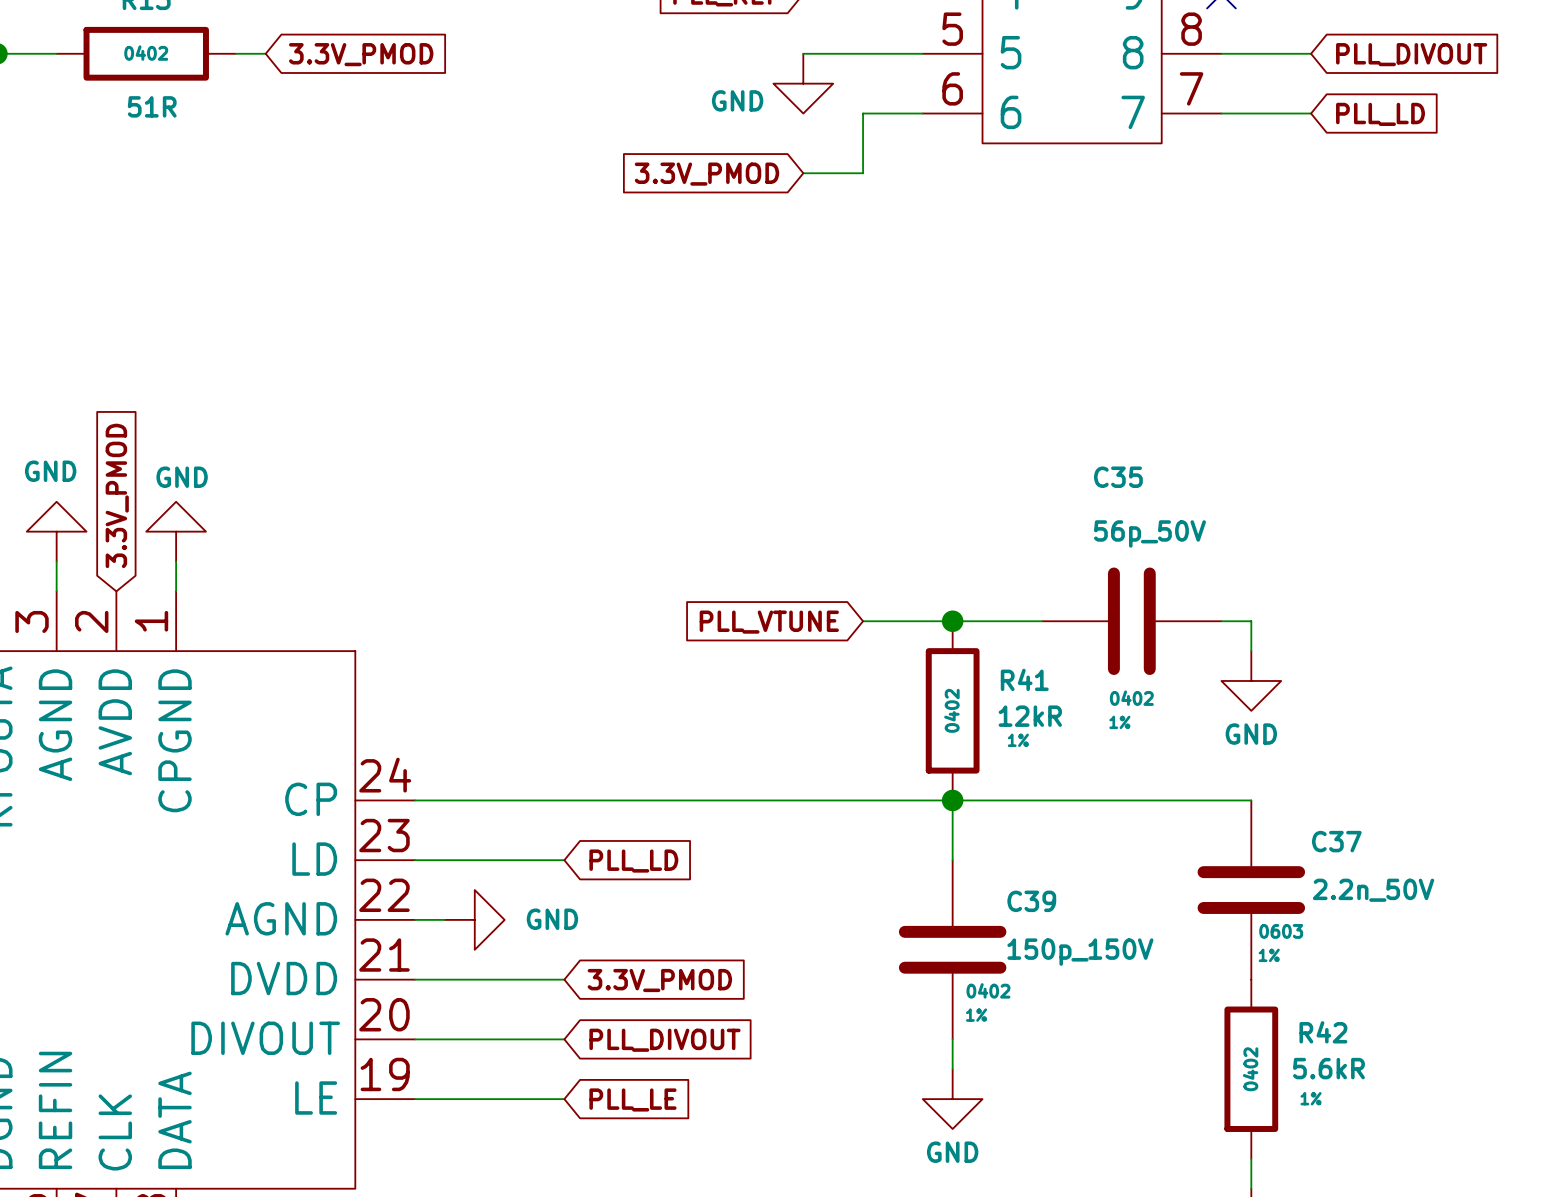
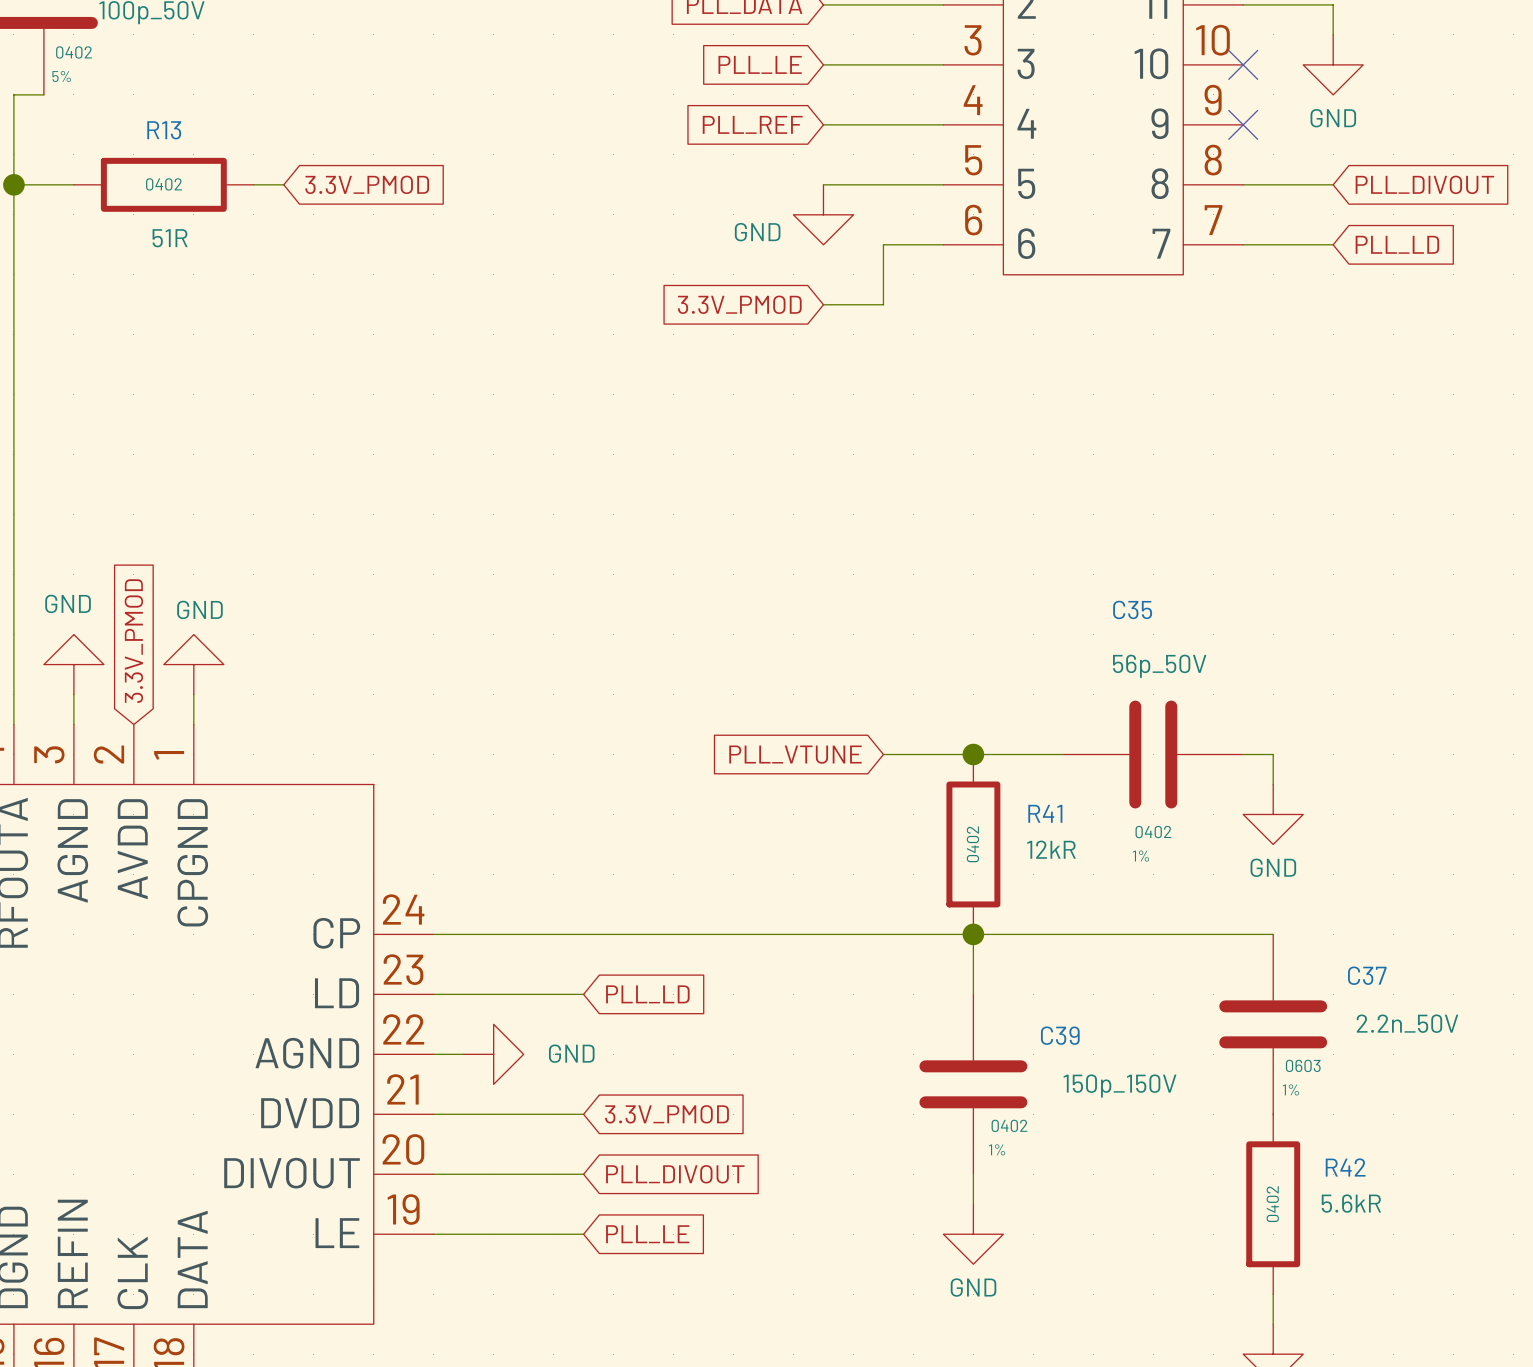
R41 text: 1% (1018, 740) -> none
R42 text: 1% (1311, 1098) -> none

